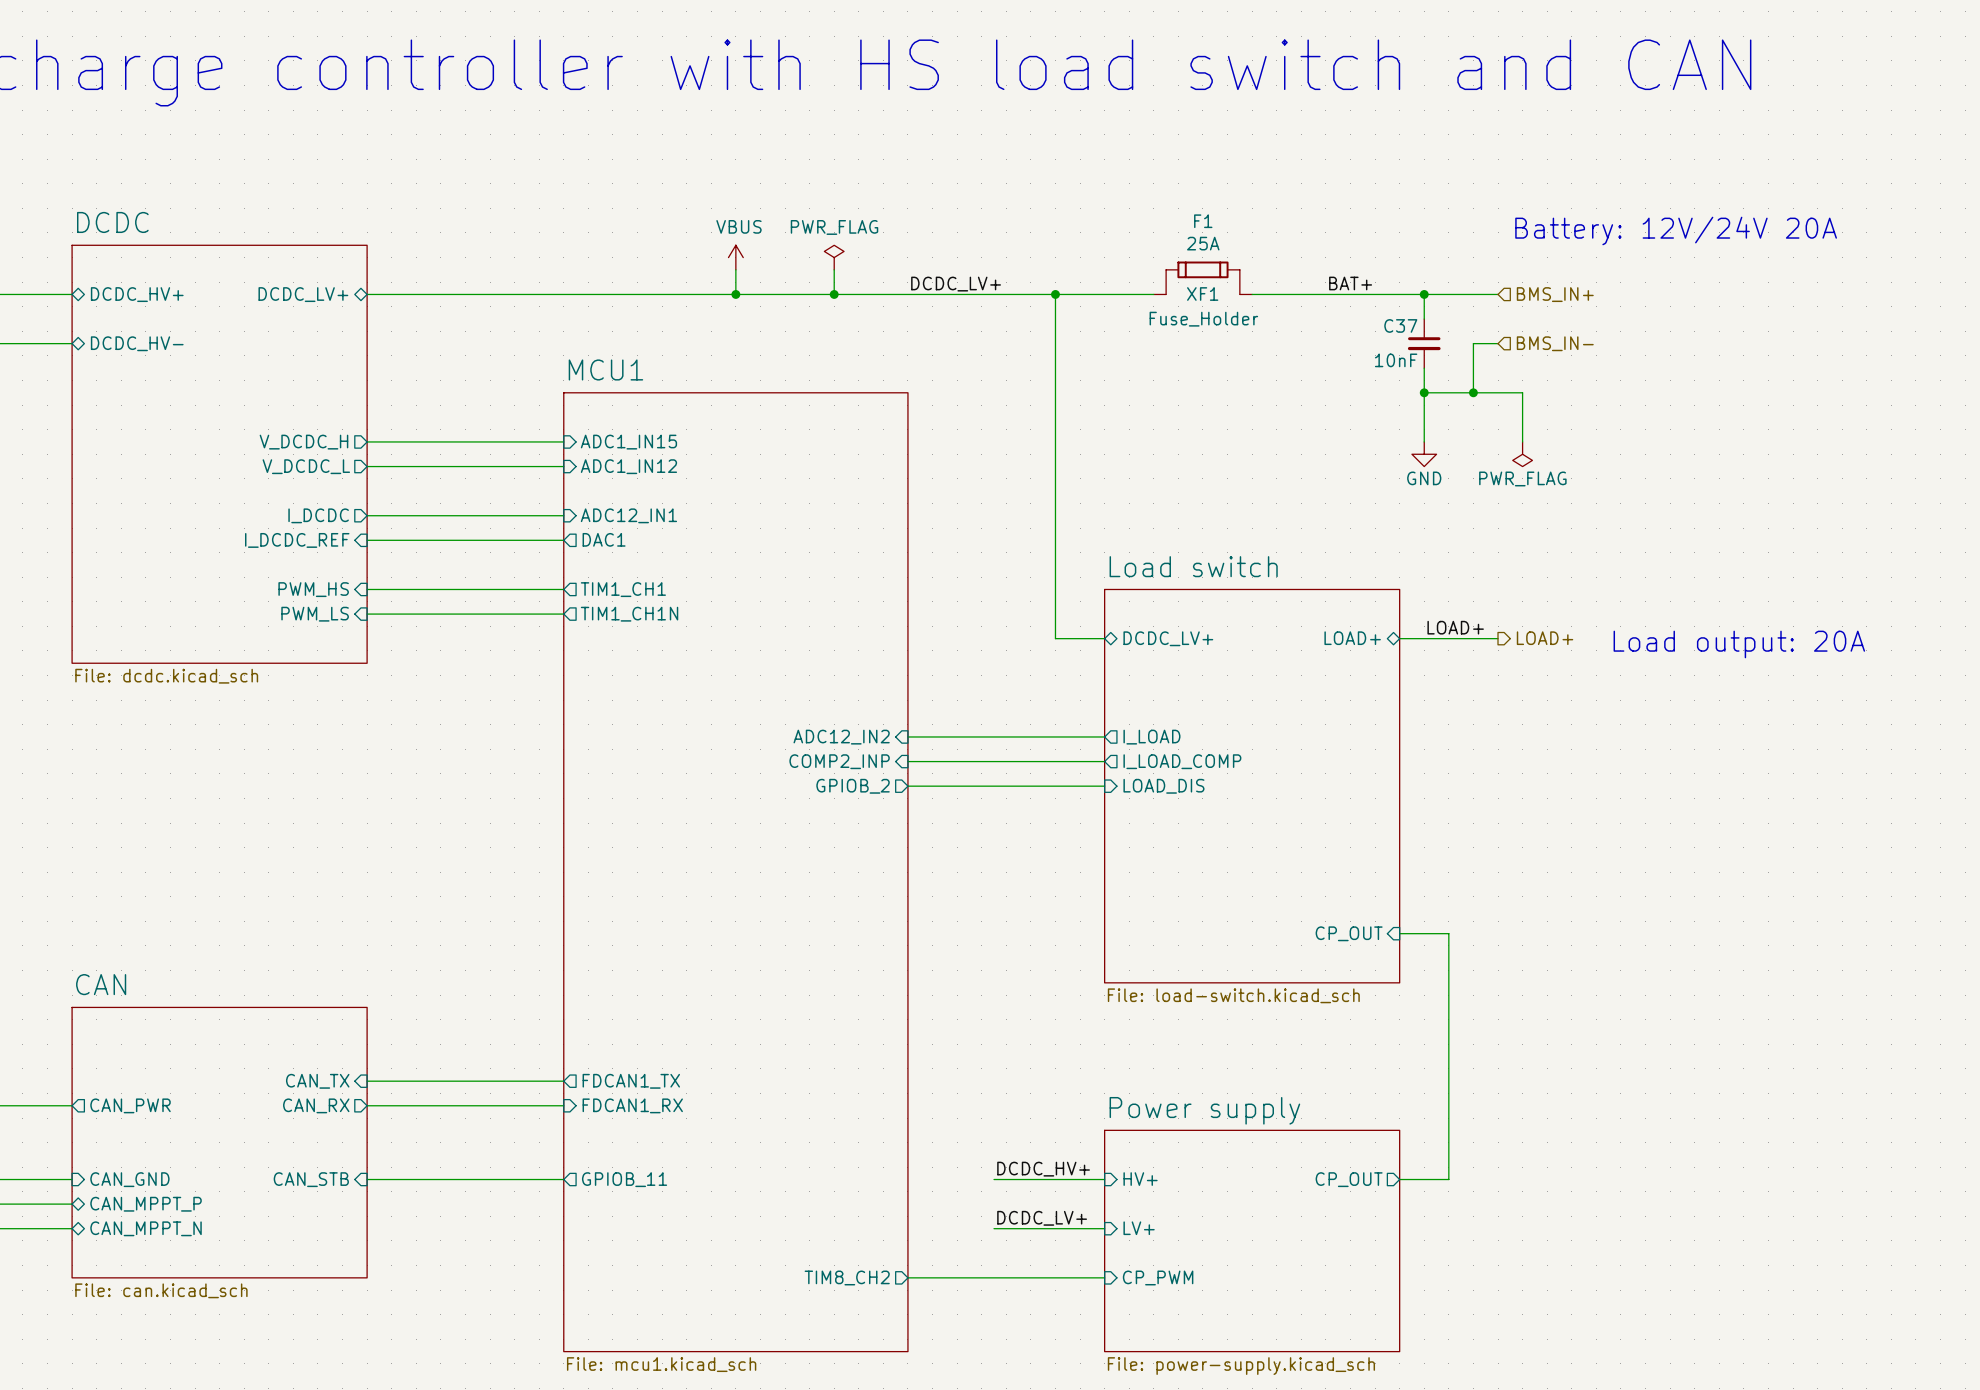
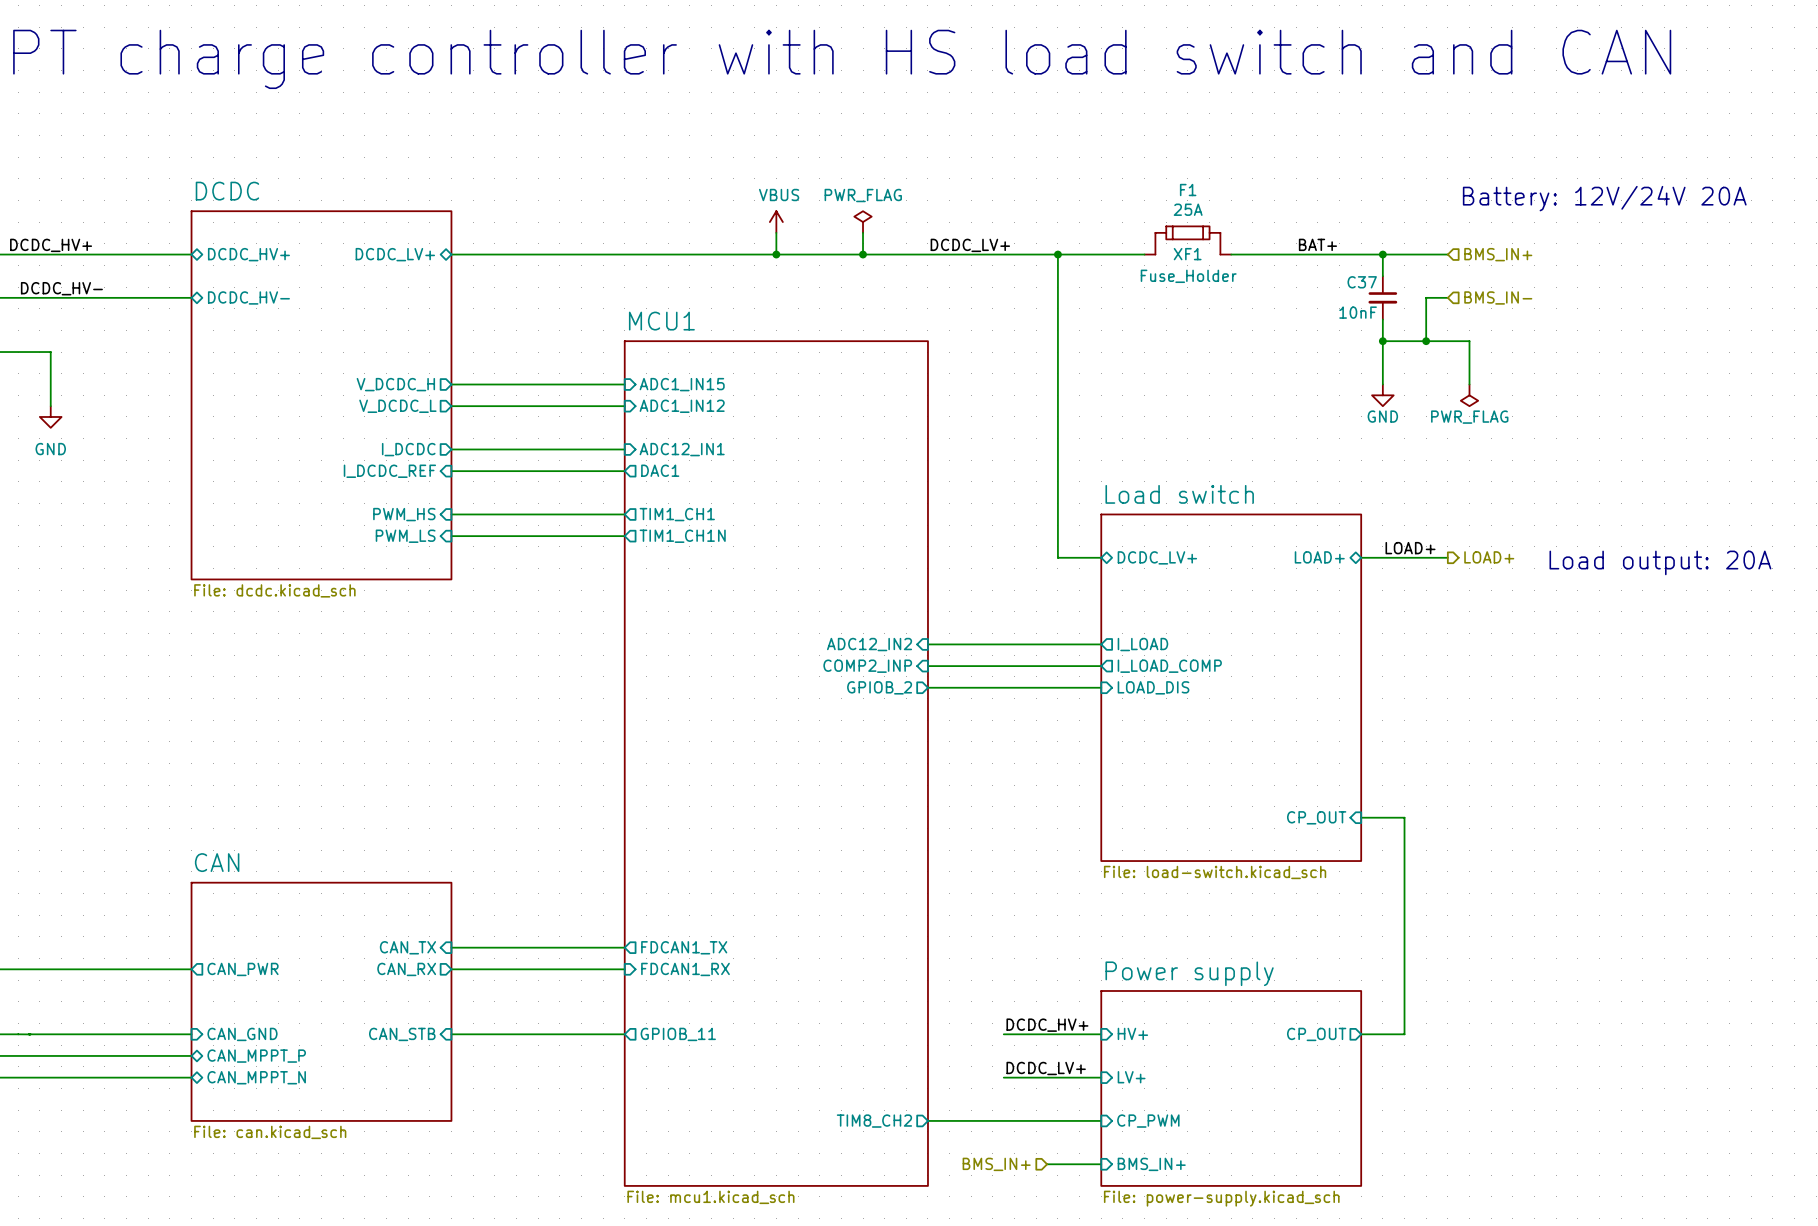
hierarchical label: none -> BMS_IN+ (996, 1164)
wire: none -> (1047, 1164) (1101, 1164)
sheet pin: none -> BMS_IN+ (1151, 1164)

